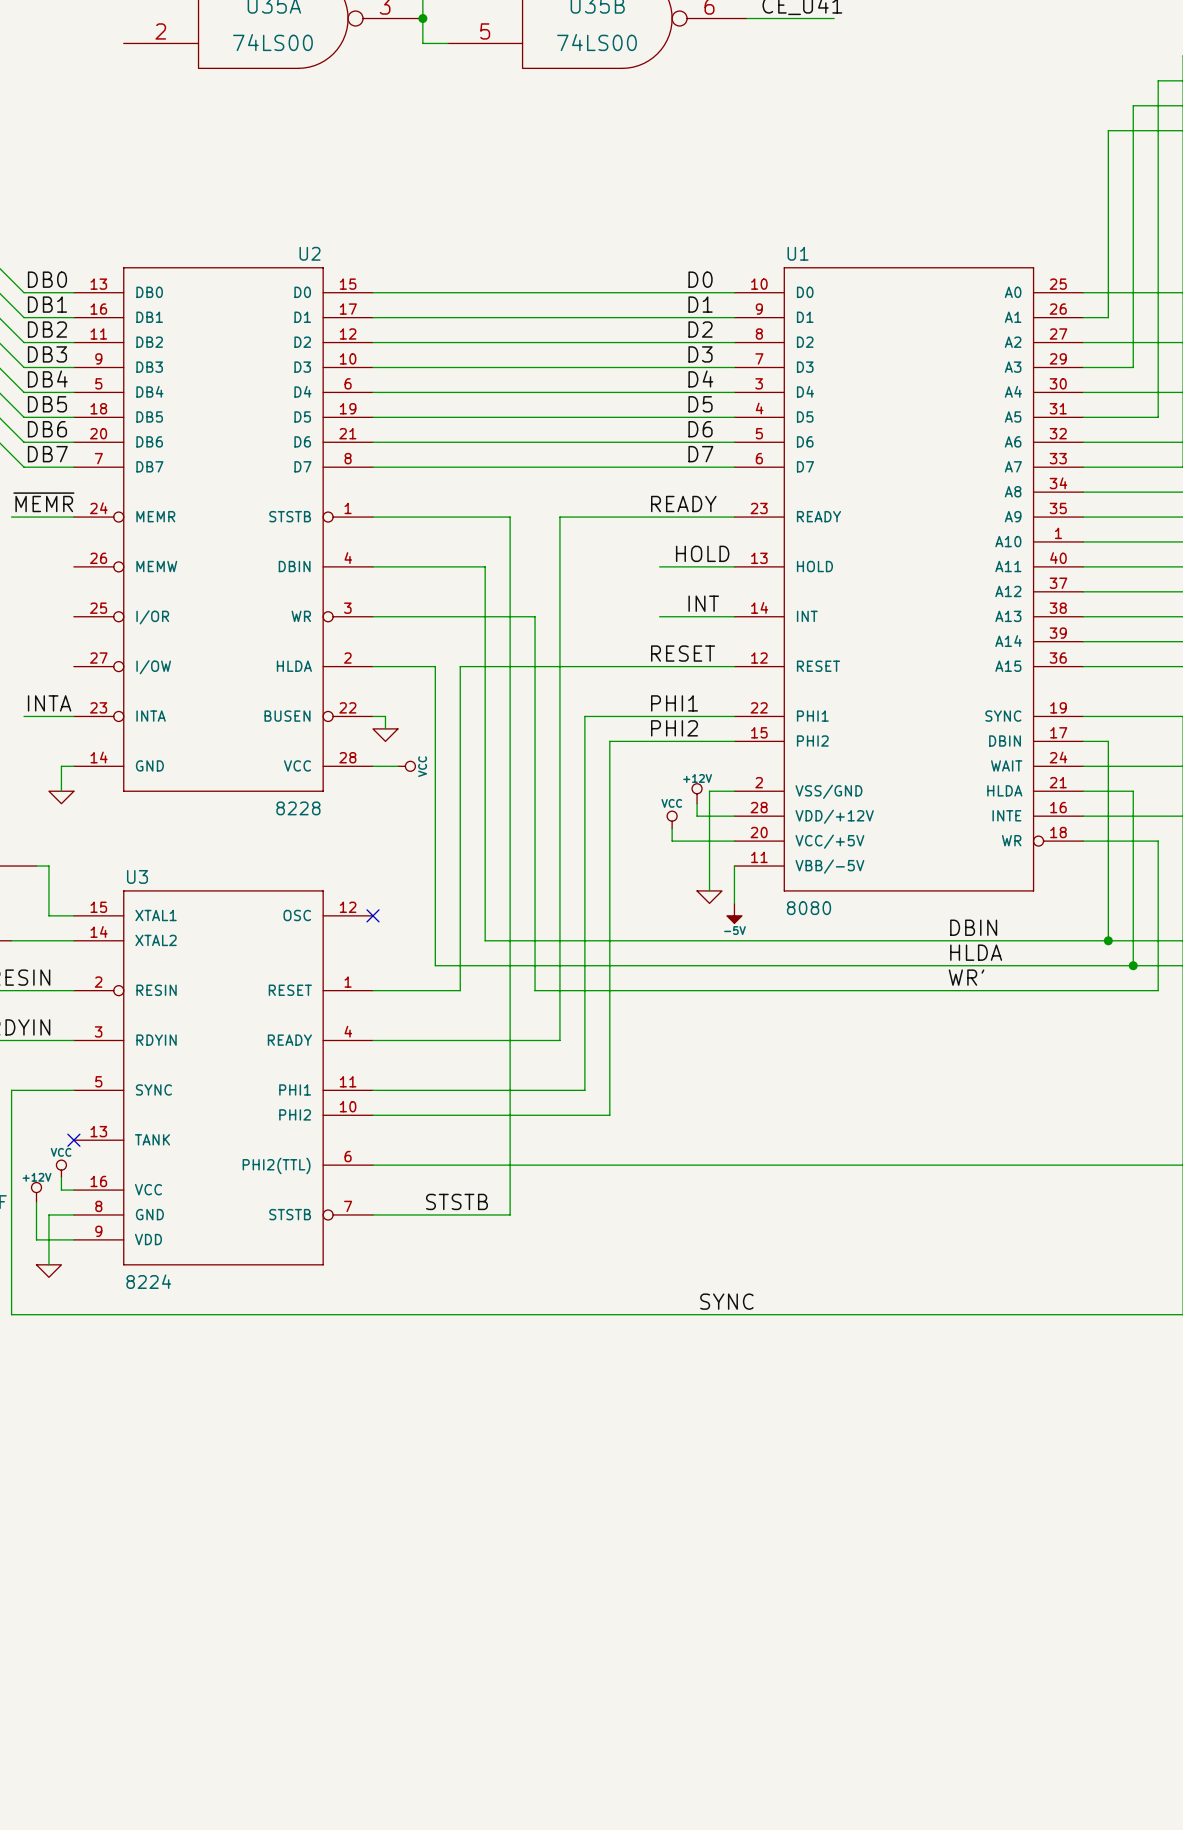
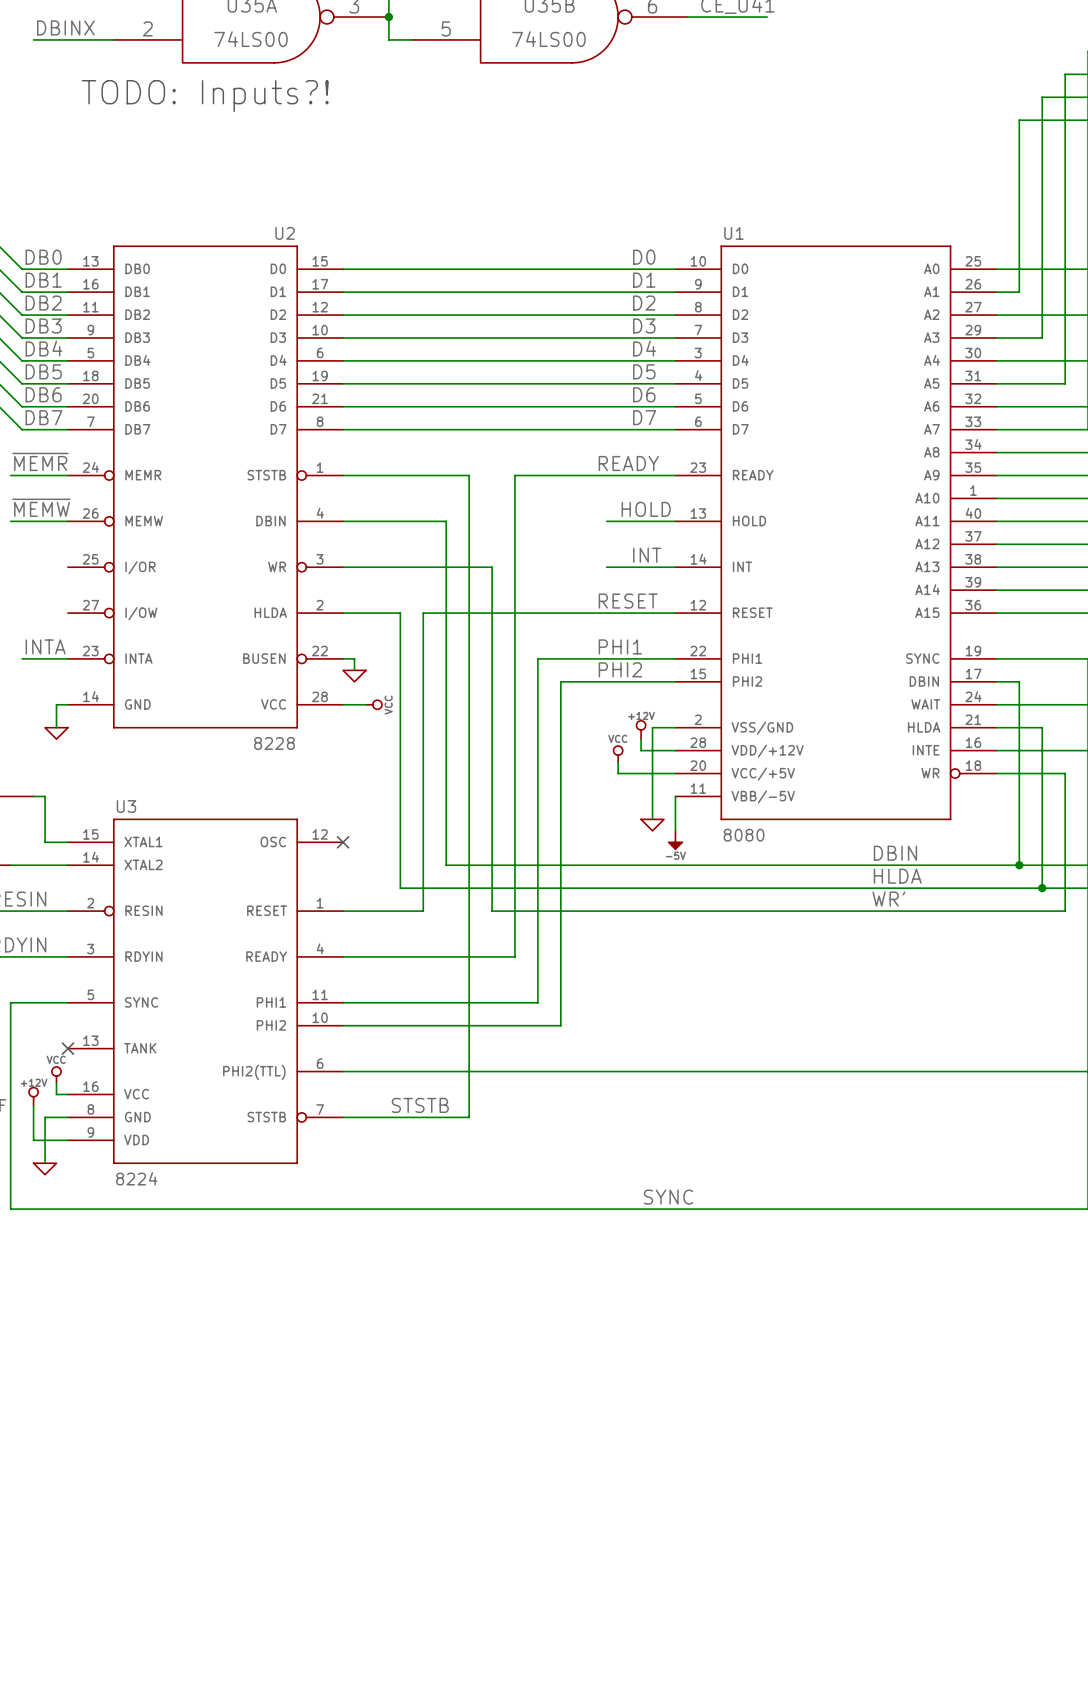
label: none -> DBINX (65, 27)
wire: none -> (33, 39) (113, 39)
text: none -> TODO: Inputs?! (205, 96)
label: none -> ~{MEMW} (41, 507)
wire: none -> (10, 521) (67, 521)

